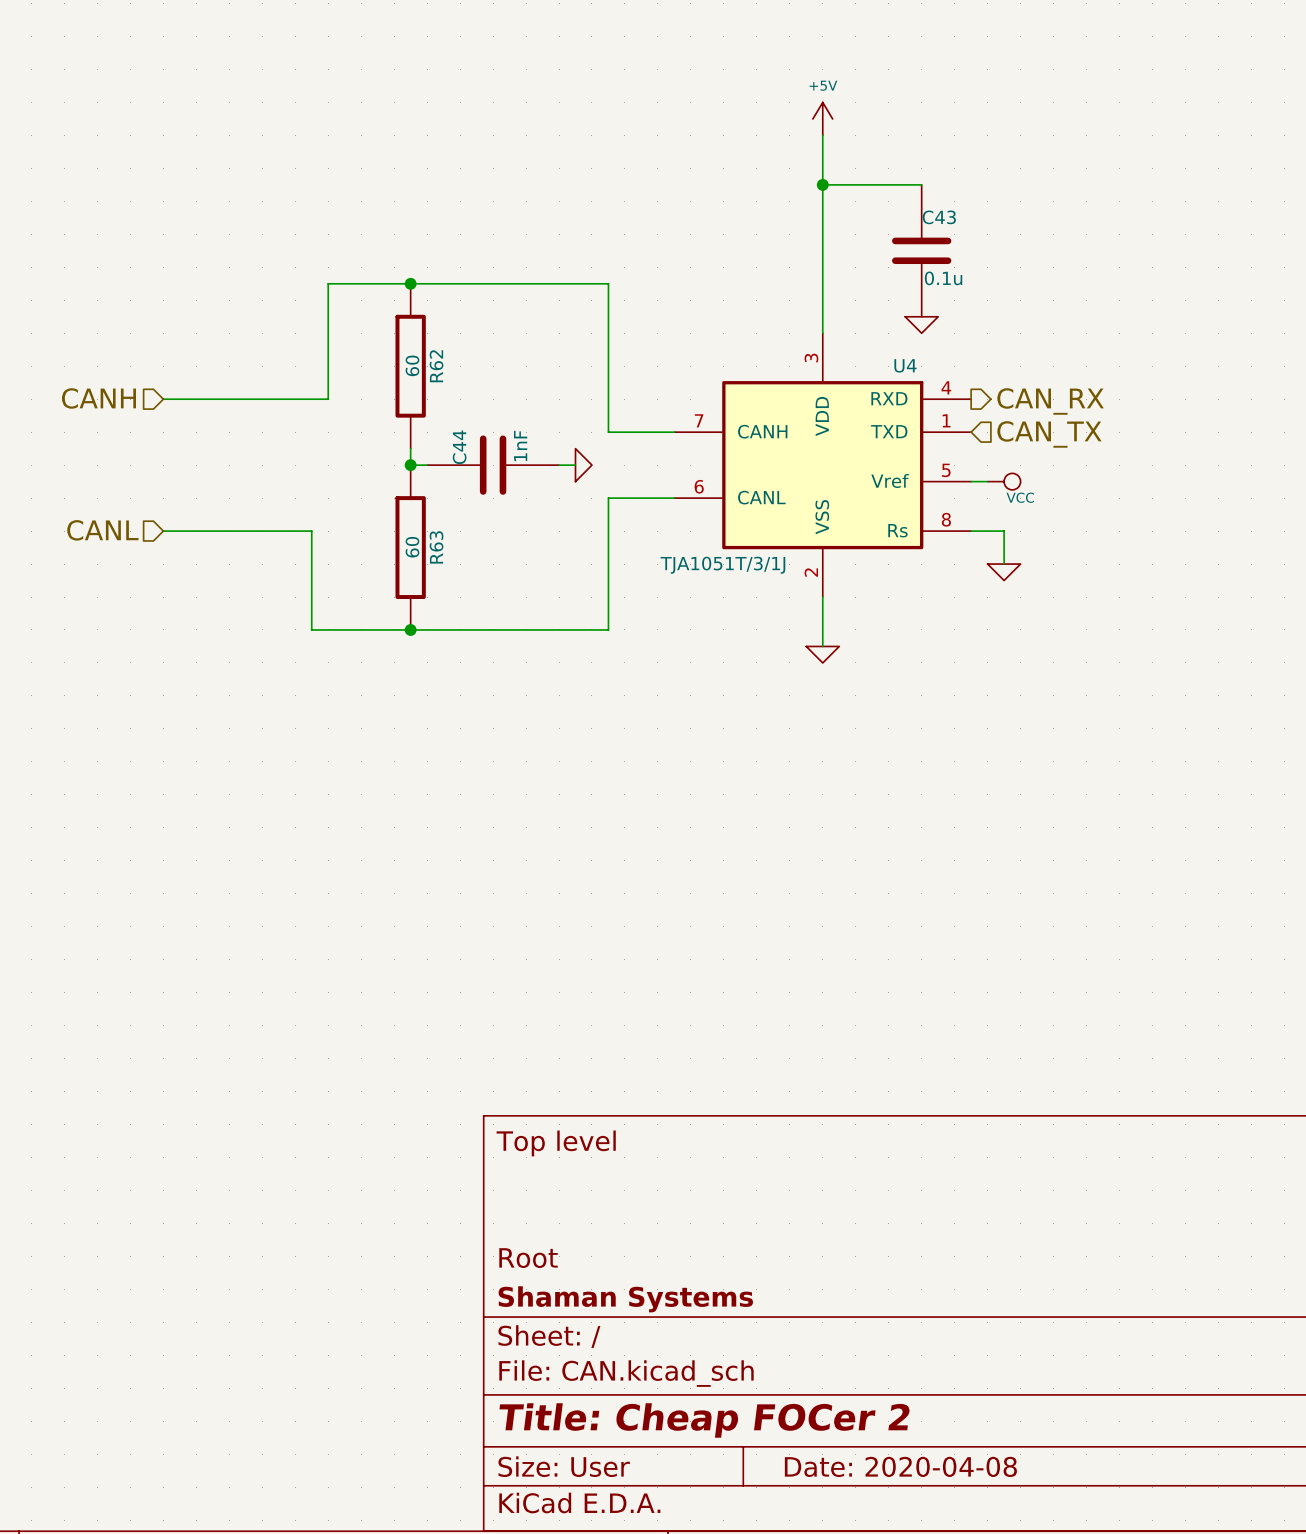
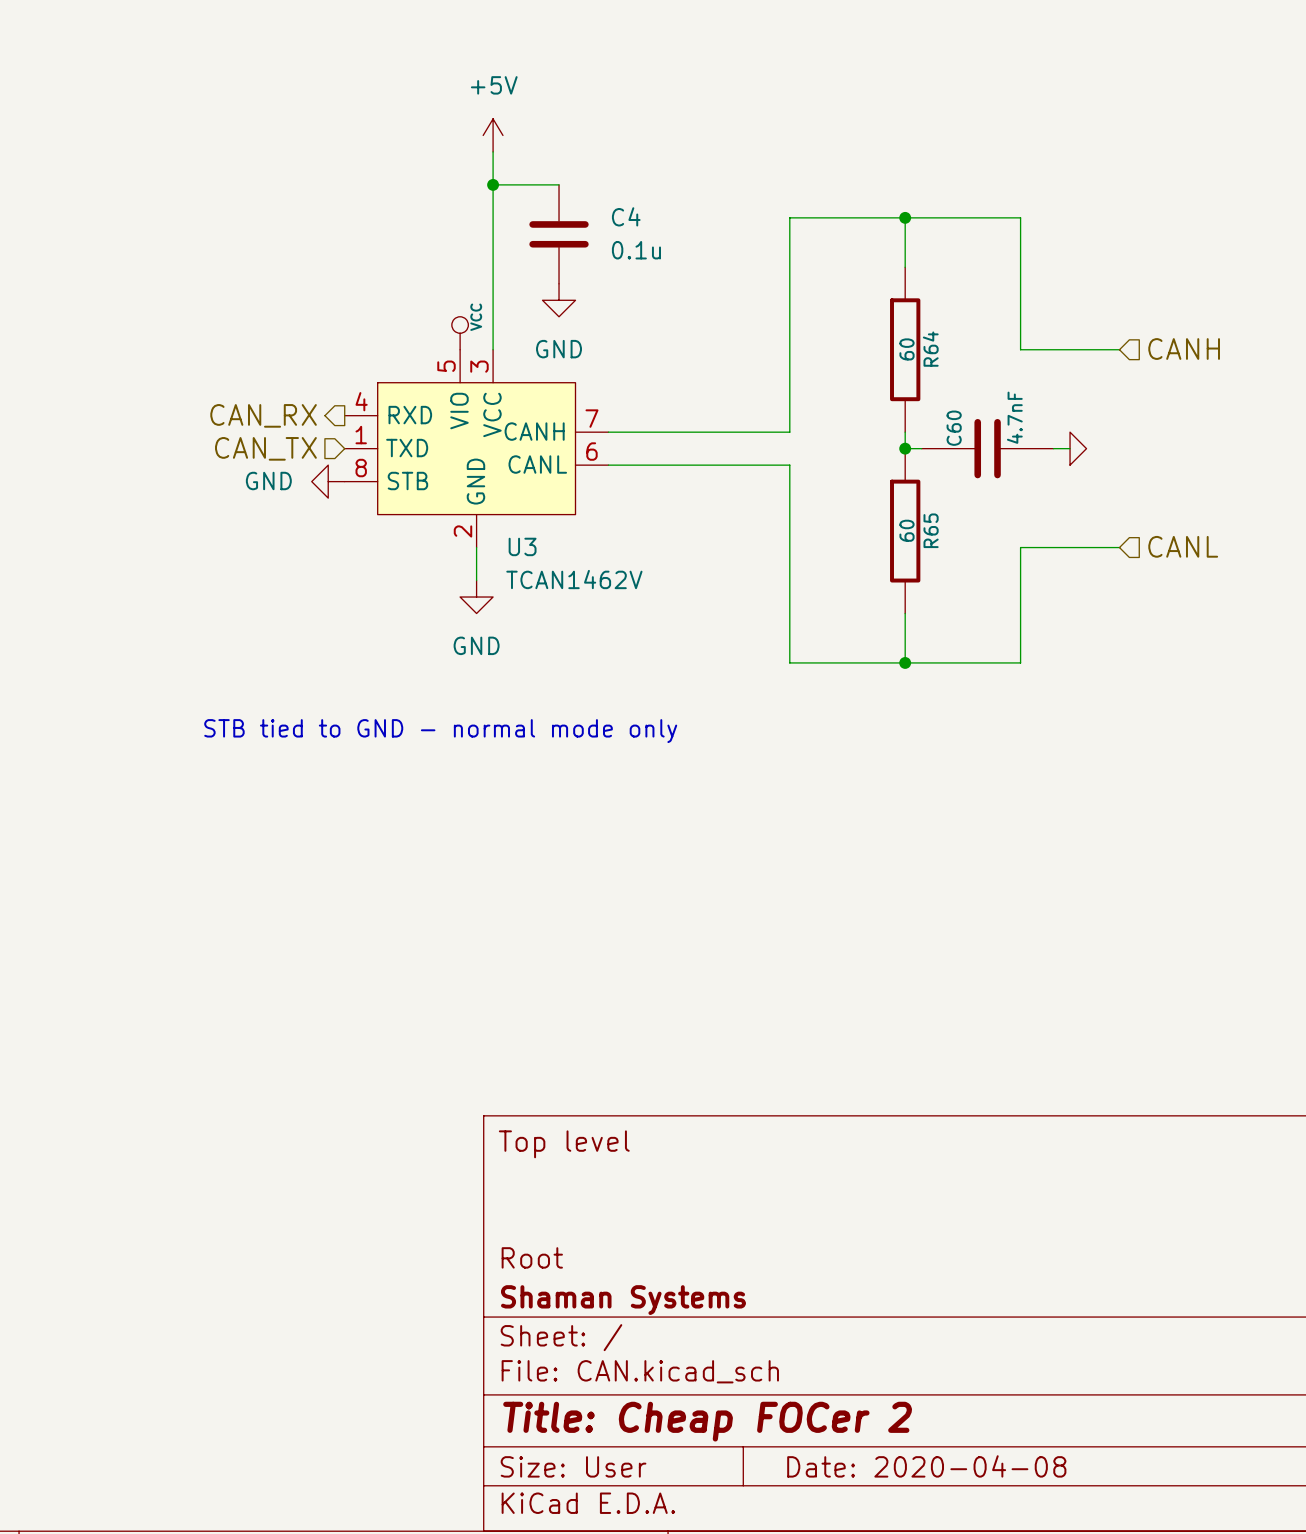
power symbol: +5V (822, 118) -> none
power symbol: none -> +5V (493, 135)
wire: (822, 135) (822, 333) -> none
wire: none -> (493, 151) (493, 349)
wire: none -> (493, 184) (559, 184)
junction: none -> (493, 184)
wire: (822, 184) (921, 184) -> none
junction: (822, 184) -> none
wire: none -> (905, 217) (905, 267)
junction: none -> (905, 217)
C4: none -> 0.1u (559, 234)
C43: 0.1u (921, 250) -> none
junction: (410, 283) -> none
power symbol: none -> GND (559, 300)
power symbol: (921, 325) -> none
power symbol: none -> VCC (460, 333)
R64: none -> 60 (905, 349)
wire: none -> (1119, 349) (1020, 349) (1020, 217) (789, 217) (789, 432) (674, 432)
hierarchical label: none -> CANH (1184, 349)
R62: 60 (410, 366) -> none
hierarchical label: CANH (98, 398) -> none
wire: (163, 399) (328, 399) (328, 283) (608, 283) (608, 432) -> none
hierarchical label: CAN_RX (1050, 401) -> none
hierarchical label: none -> CAN_RX (263, 415)
hierarchical label: CAN_TX (1049, 434) -> none
U3: none -> TCAN1462V (476, 448)
junction: none -> (905, 448)
C60: none -> 4.7nF (987, 448)
power symbol: none -> (1078, 448)
hierarchical label: none -> CAN_TX (265, 448)
junction: (410, 465) -> none
C44: 1nF (493, 465) -> none
power symbol: (583, 465) -> none
wire: none -> (608, 465) (789, 465) (789, 662) (1020, 662) (1020, 547) (1119, 547)
U4: TJA1051T/3/1J (822, 465) -> none
power symbol: none -> GND (328, 481)
wire: (971, 481) (987, 481) -> (1053, 448) (1070, 448)
power symbol: VCC (1004, 481) -> none
wire: (674, 498) (608, 498) (608, 629) (311, 629) (311, 531) (163, 531) -> none
hierarchical label: CANL (102, 530) -> none
R65: none -> 60 (905, 531)
wire: (971, 531) (1004, 531) (1004, 564) -> none
hierarchical label: none -> CANL (1183, 546)
R63: 60 (410, 547) -> none
wire: none -> (476, 547) (476, 580)
power symbol: (1004, 572) -> none
power symbol: none -> GND (476, 597)
wire: (822, 597) (822, 646) -> (905, 613) (905, 662)
junction: (410, 629) -> none
power symbol: (822, 654) -> none
junction: none -> (905, 662)
text: none -> STB tied to GND - normal mode only (440, 731)

